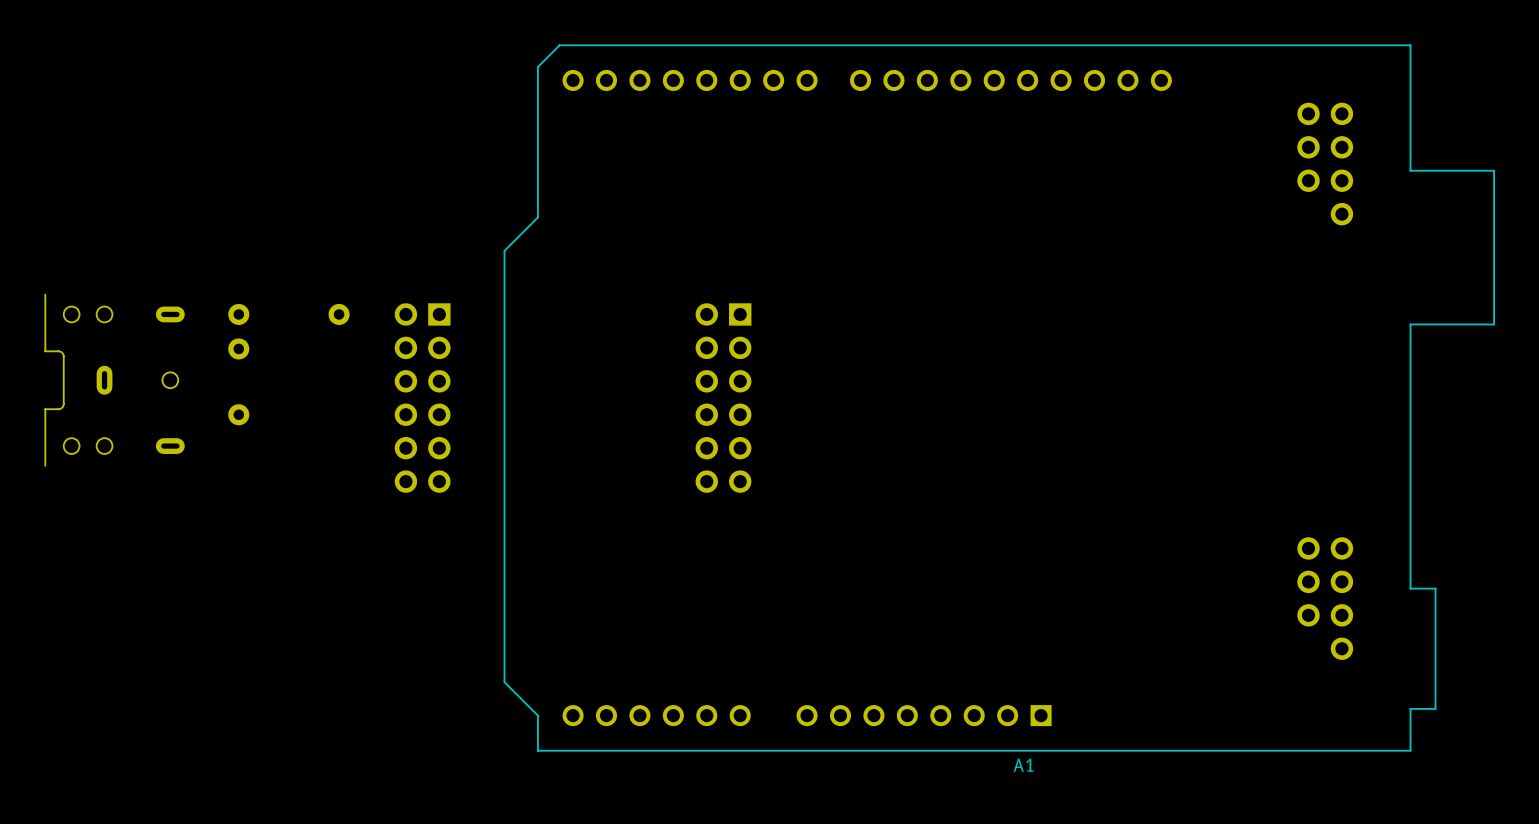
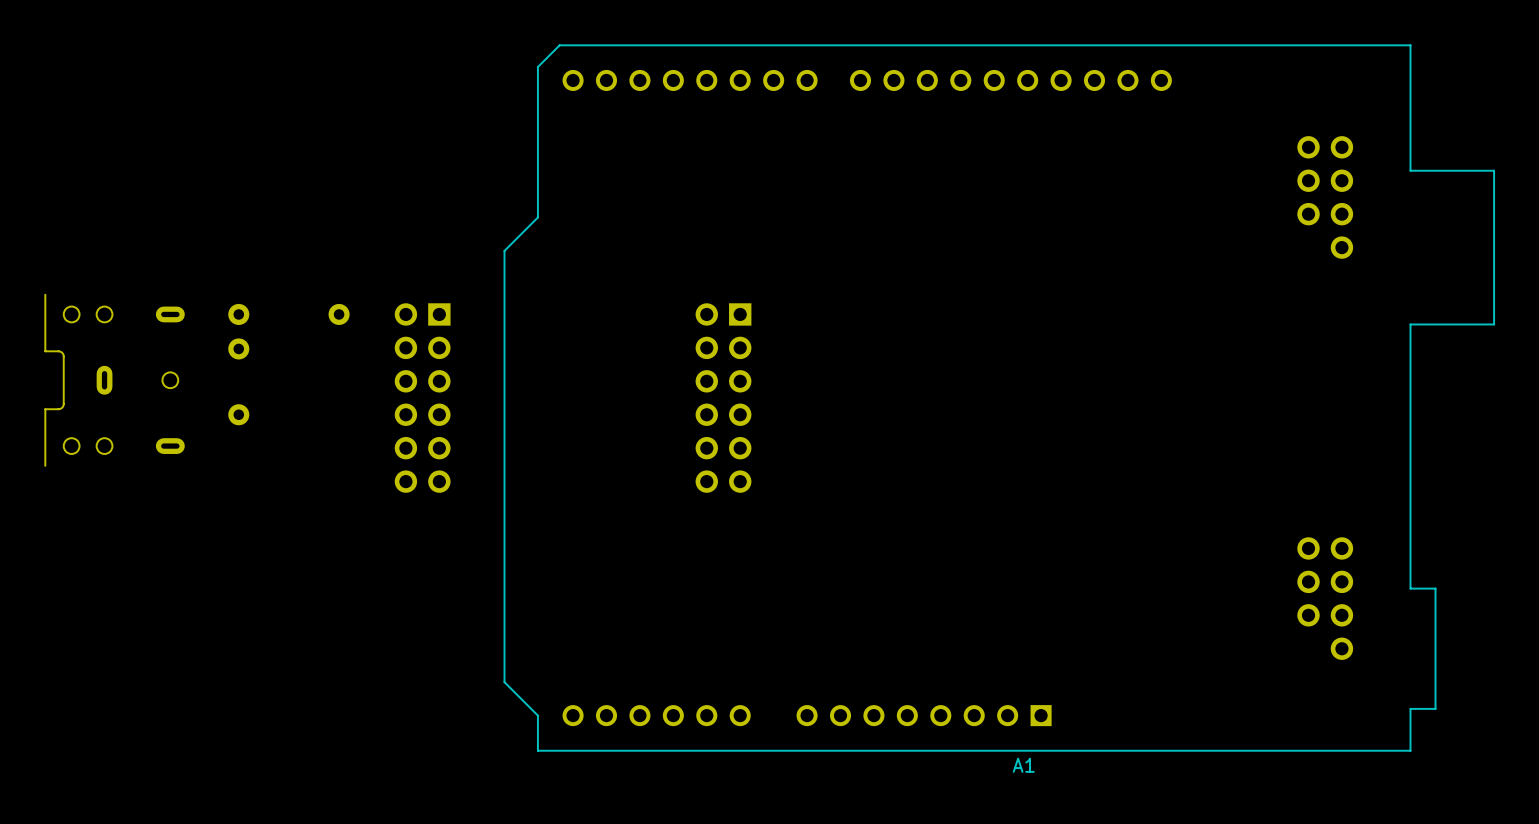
part position: (1325, 164) -> (1325, 197)

